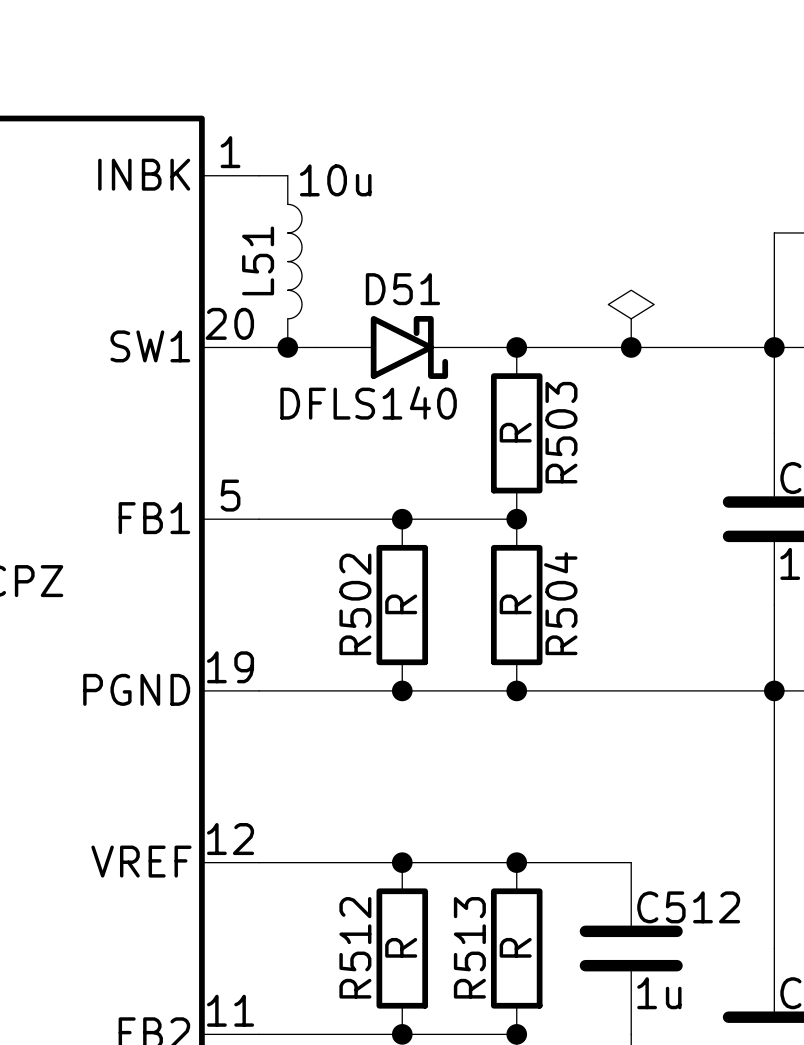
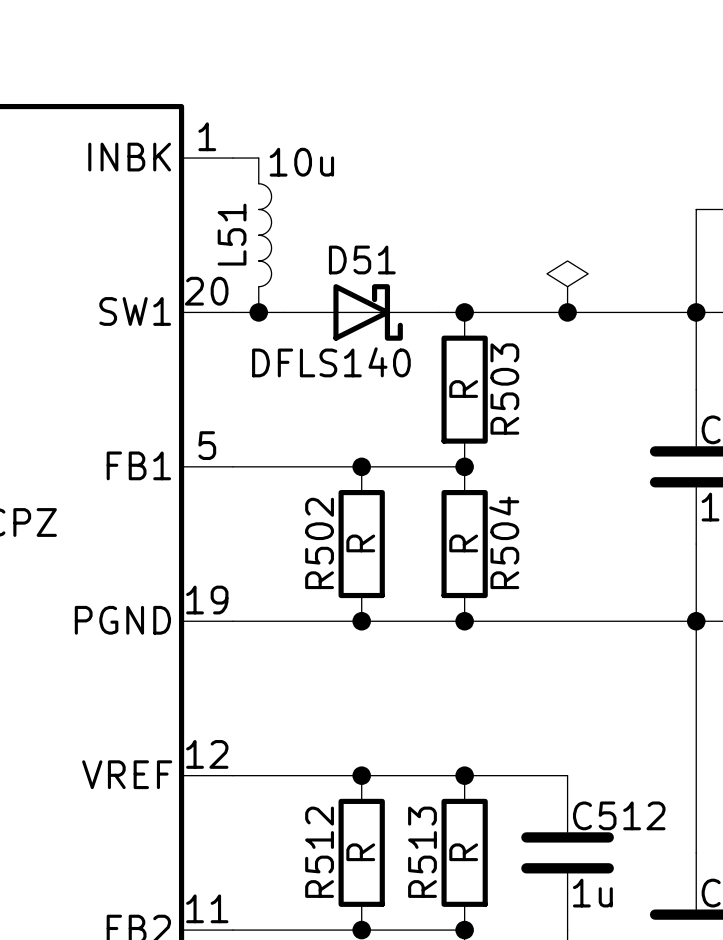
D51 symbol: [316, 315, 489, 379] -> [284, 284, 439, 341]

